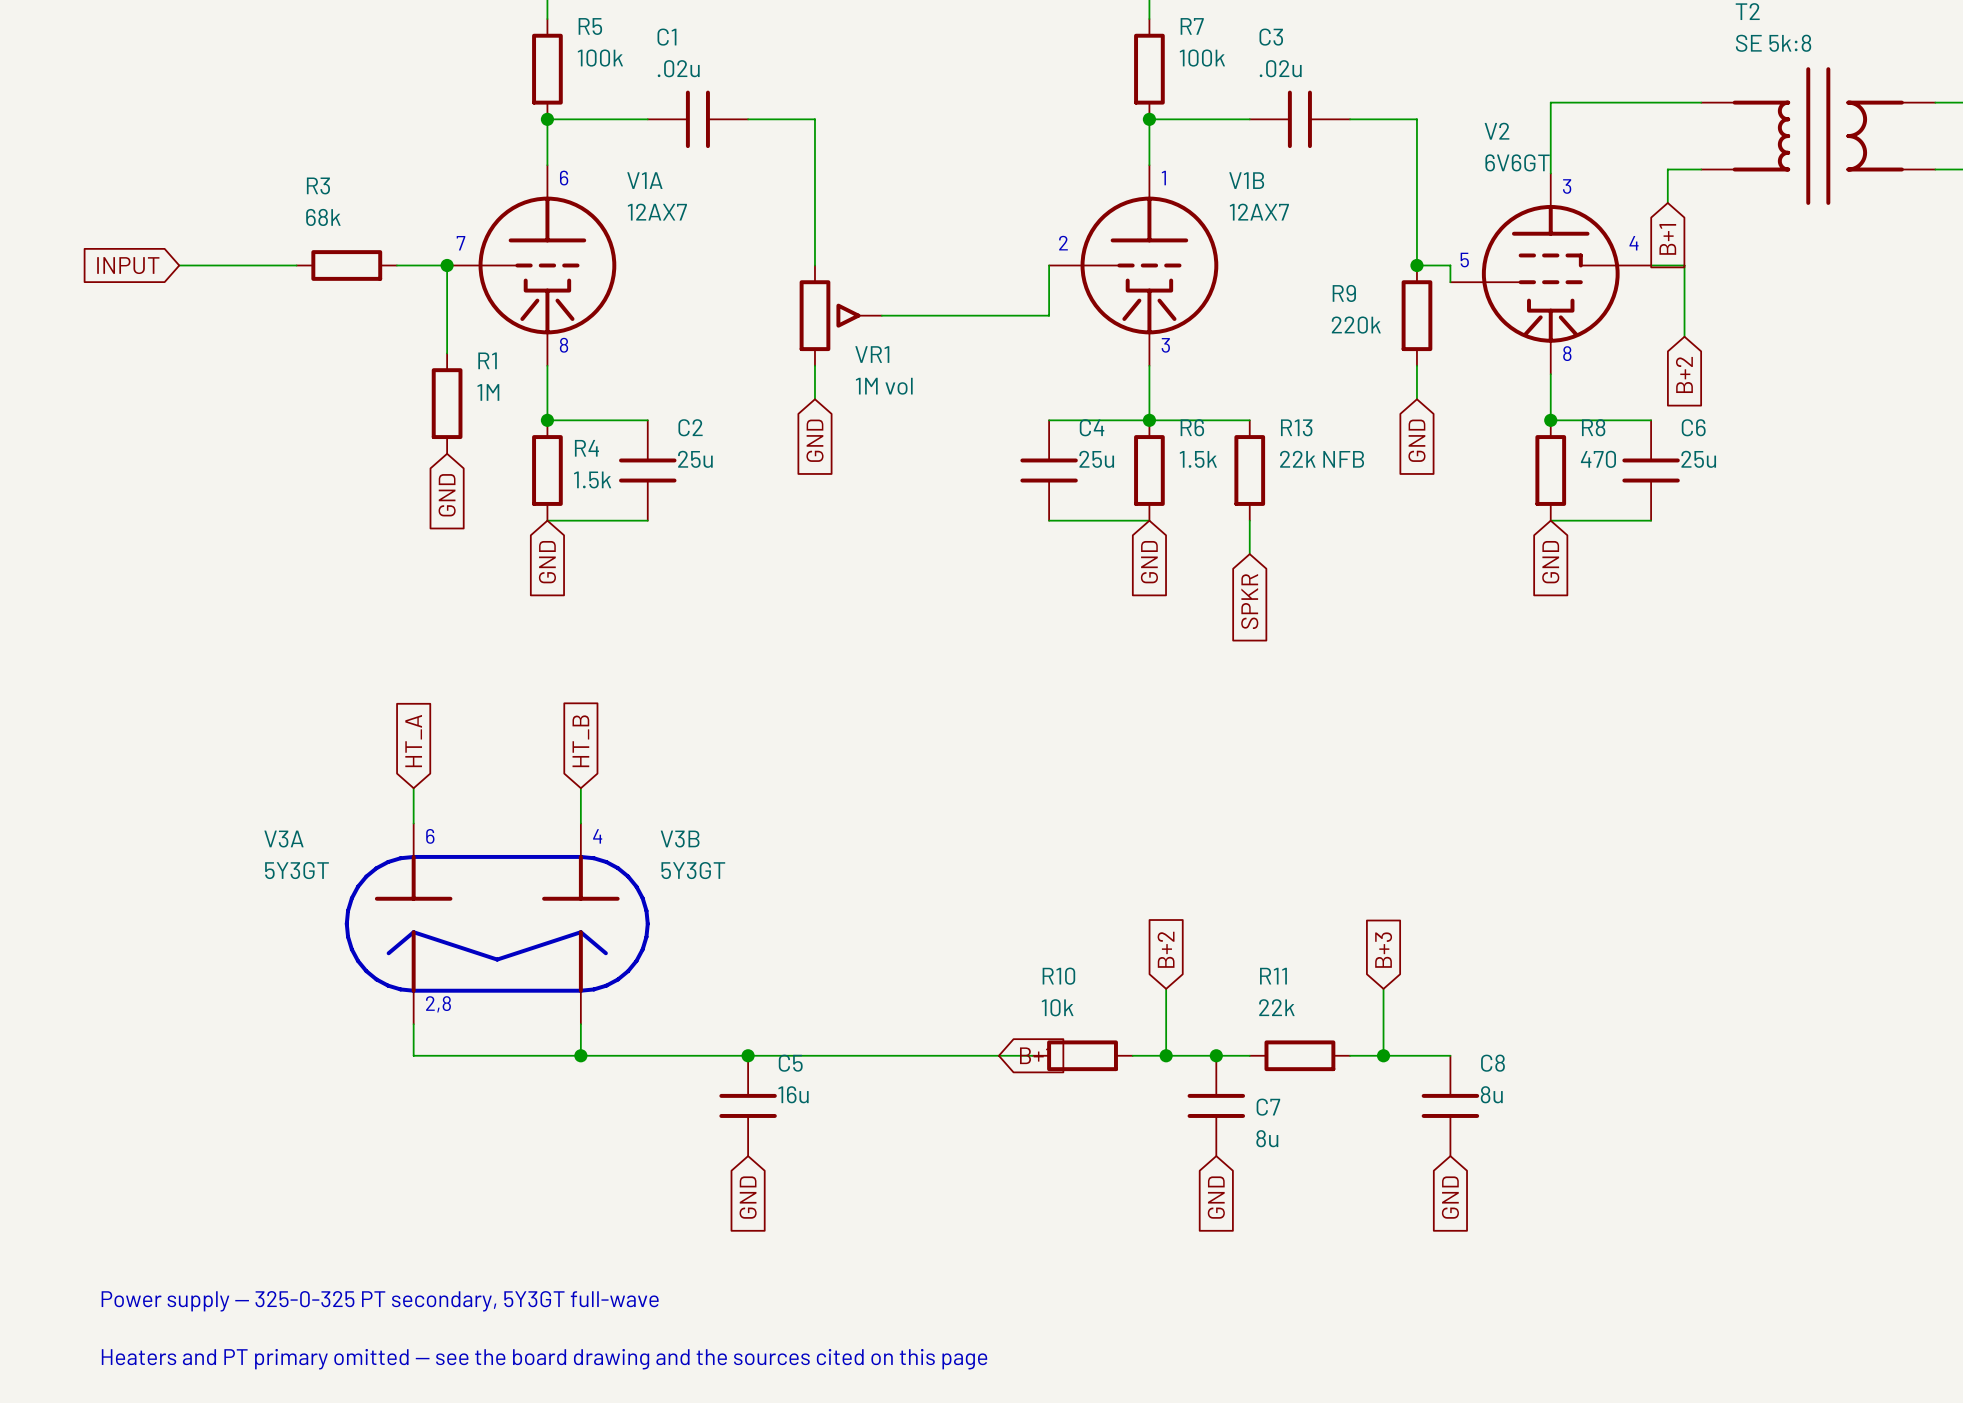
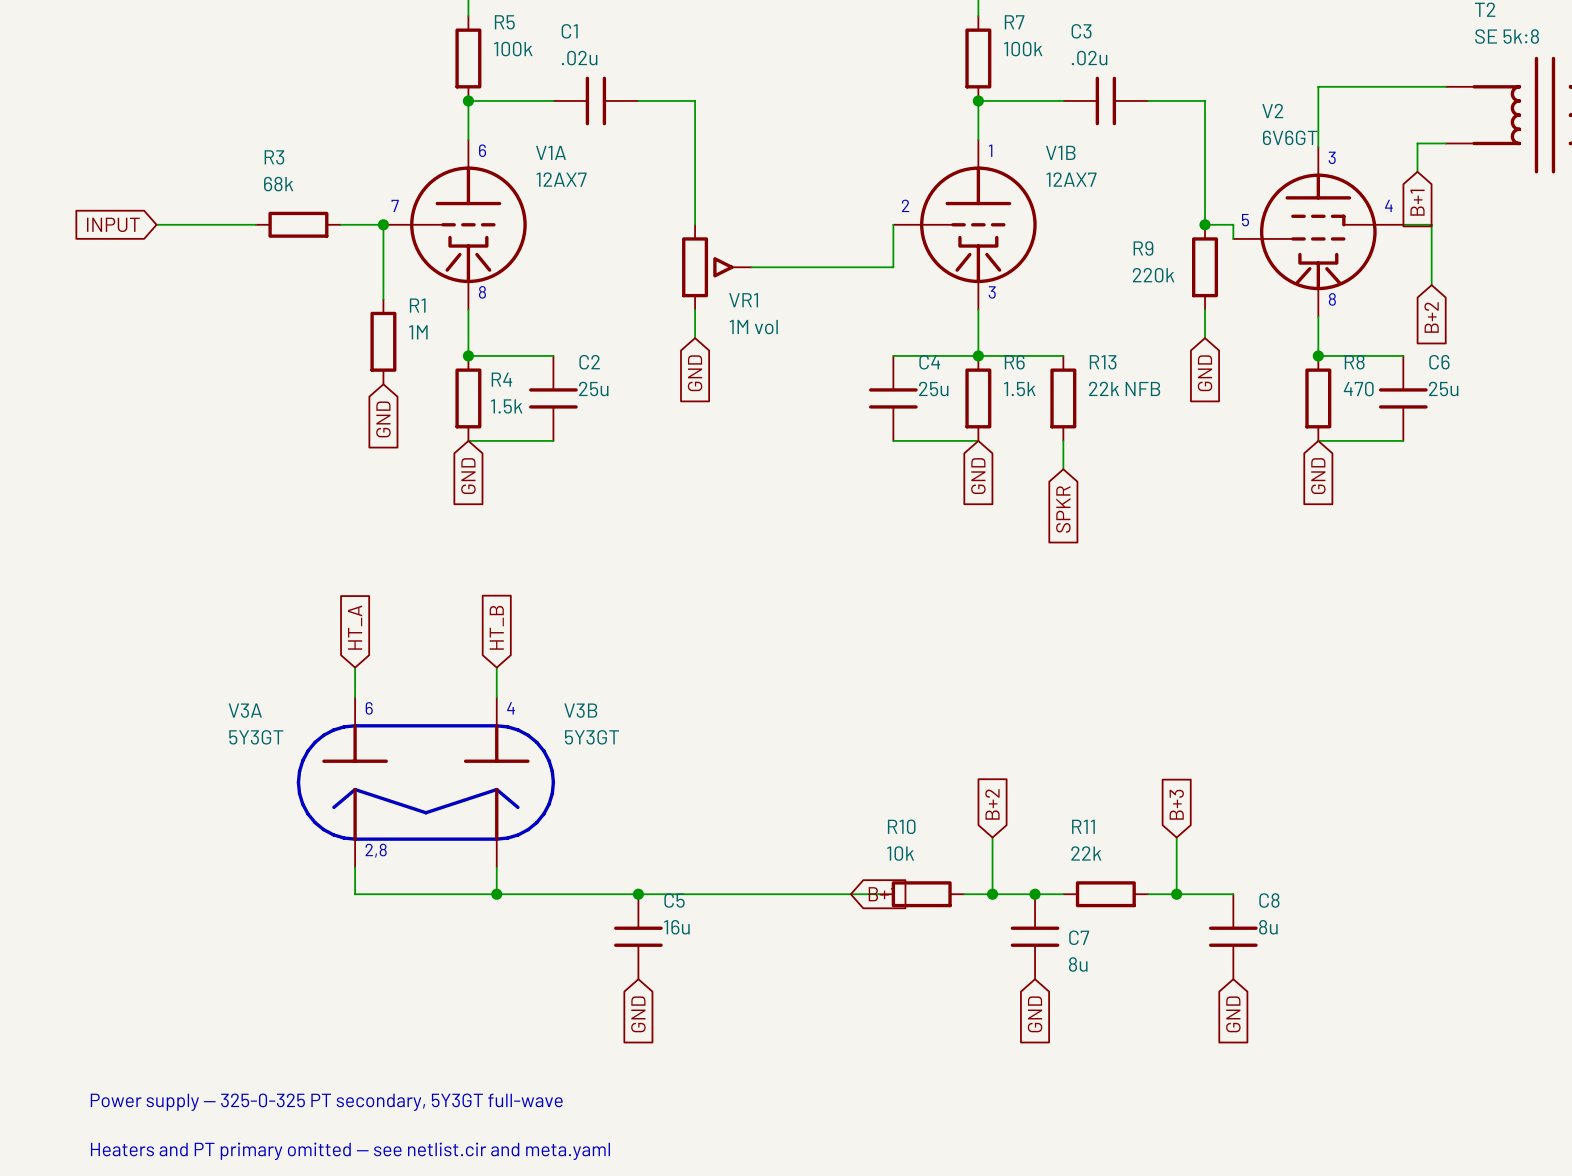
text: Heaters and PT primary omitted — see the board drawing and the sources cited on this page (544, 1359) -> Heaters and PT primary omitted — see netlist.cir and meta.yaml (350, 1151)

